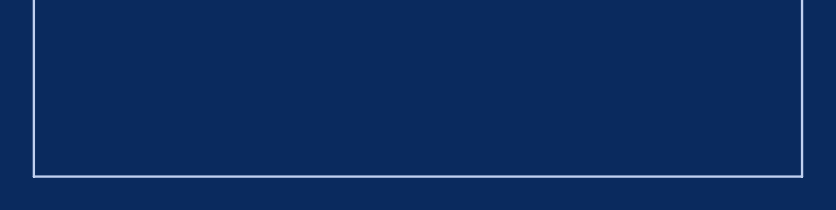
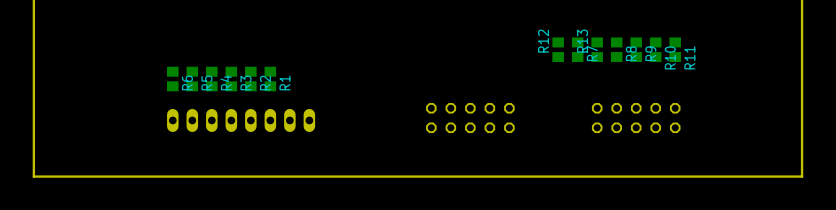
R12: none -> (558, 49)
R7: none -> (577, 49)
R13: none -> (597, 49)
R8: none -> (616, 49)
R9: none -> (636, 49)
R10: none -> (655, 49)
R11: none -> (675, 49)
R6: none -> (172, 79)
R5: none -> (192, 79)
R4: none -> (211, 79)
R3: none -> (231, 79)
R2: none -> (250, 79)
R1: none -> (270, 79)
part: none -> (470, 118)
part: none -> (636, 118)
part: none -> (241, 120)

